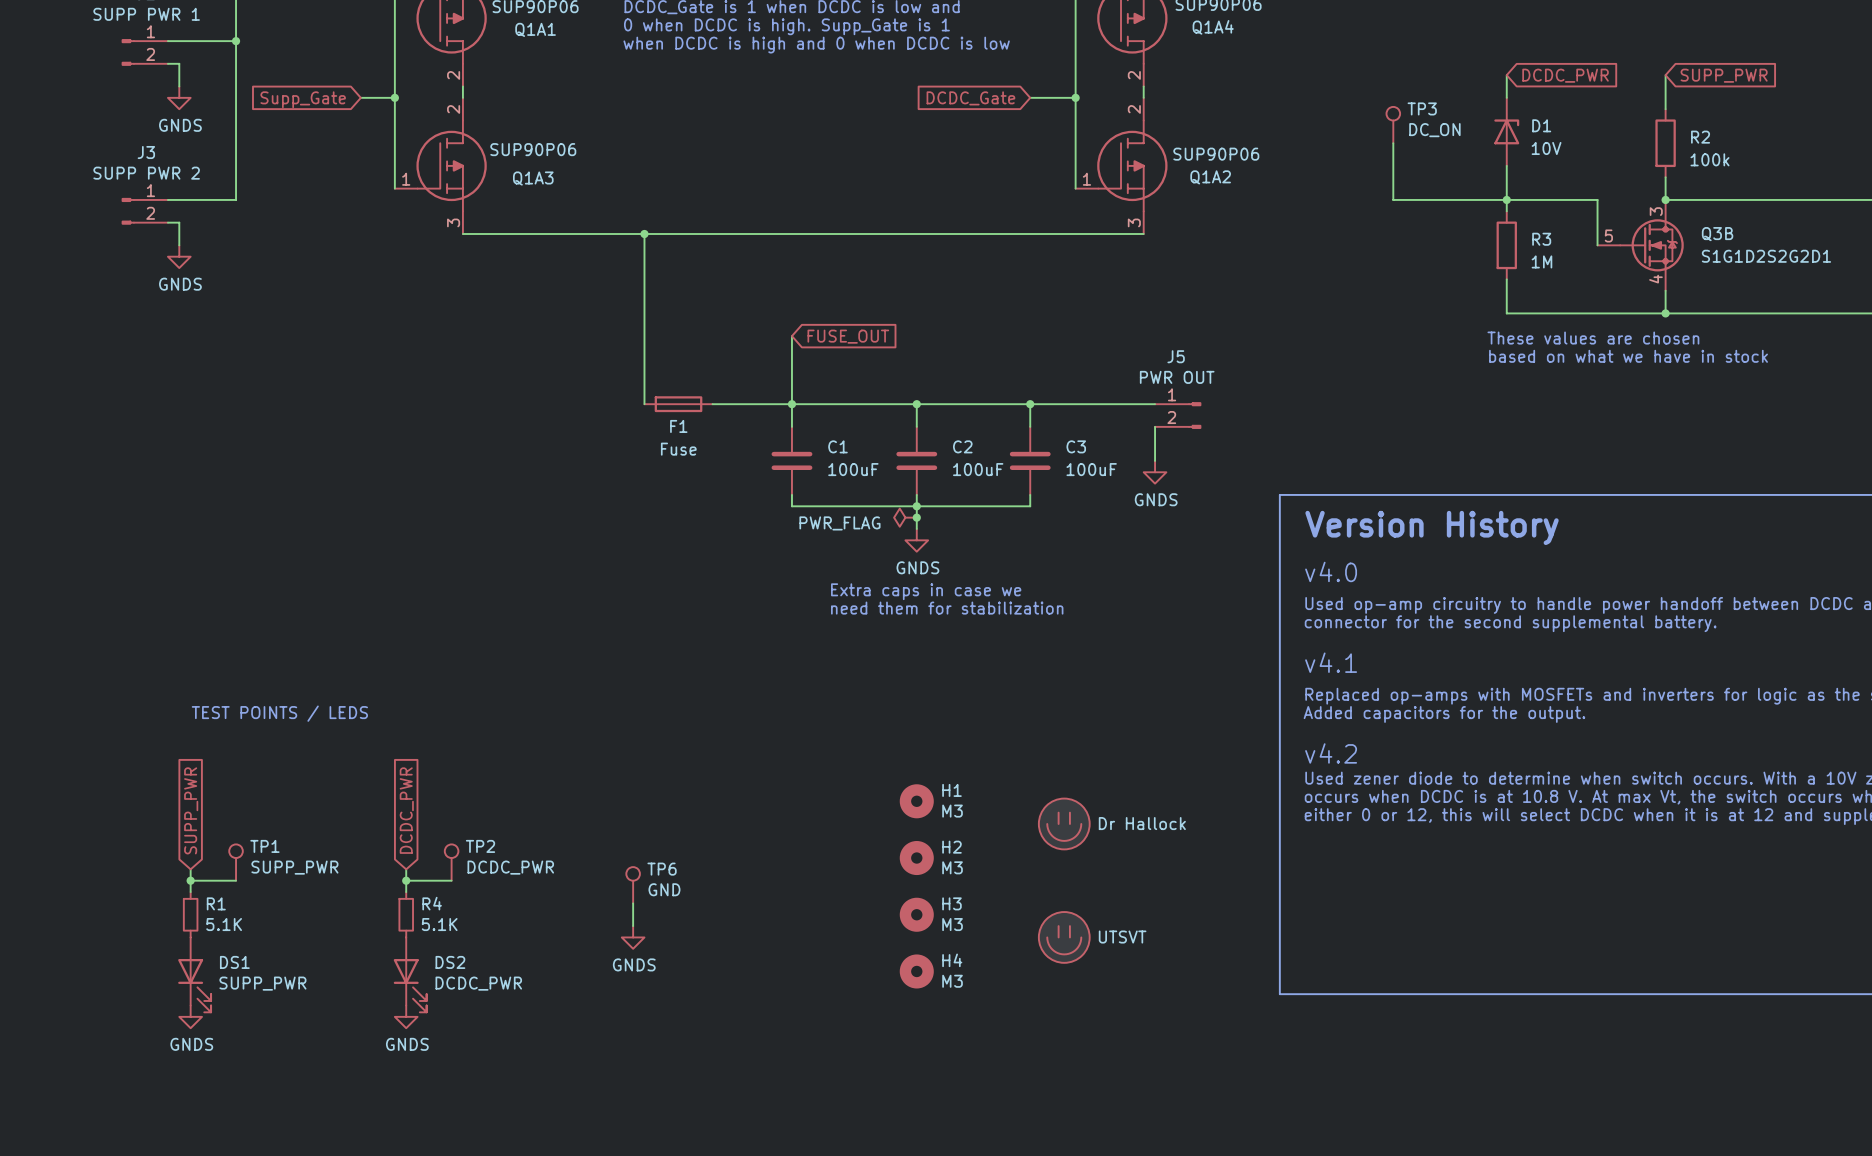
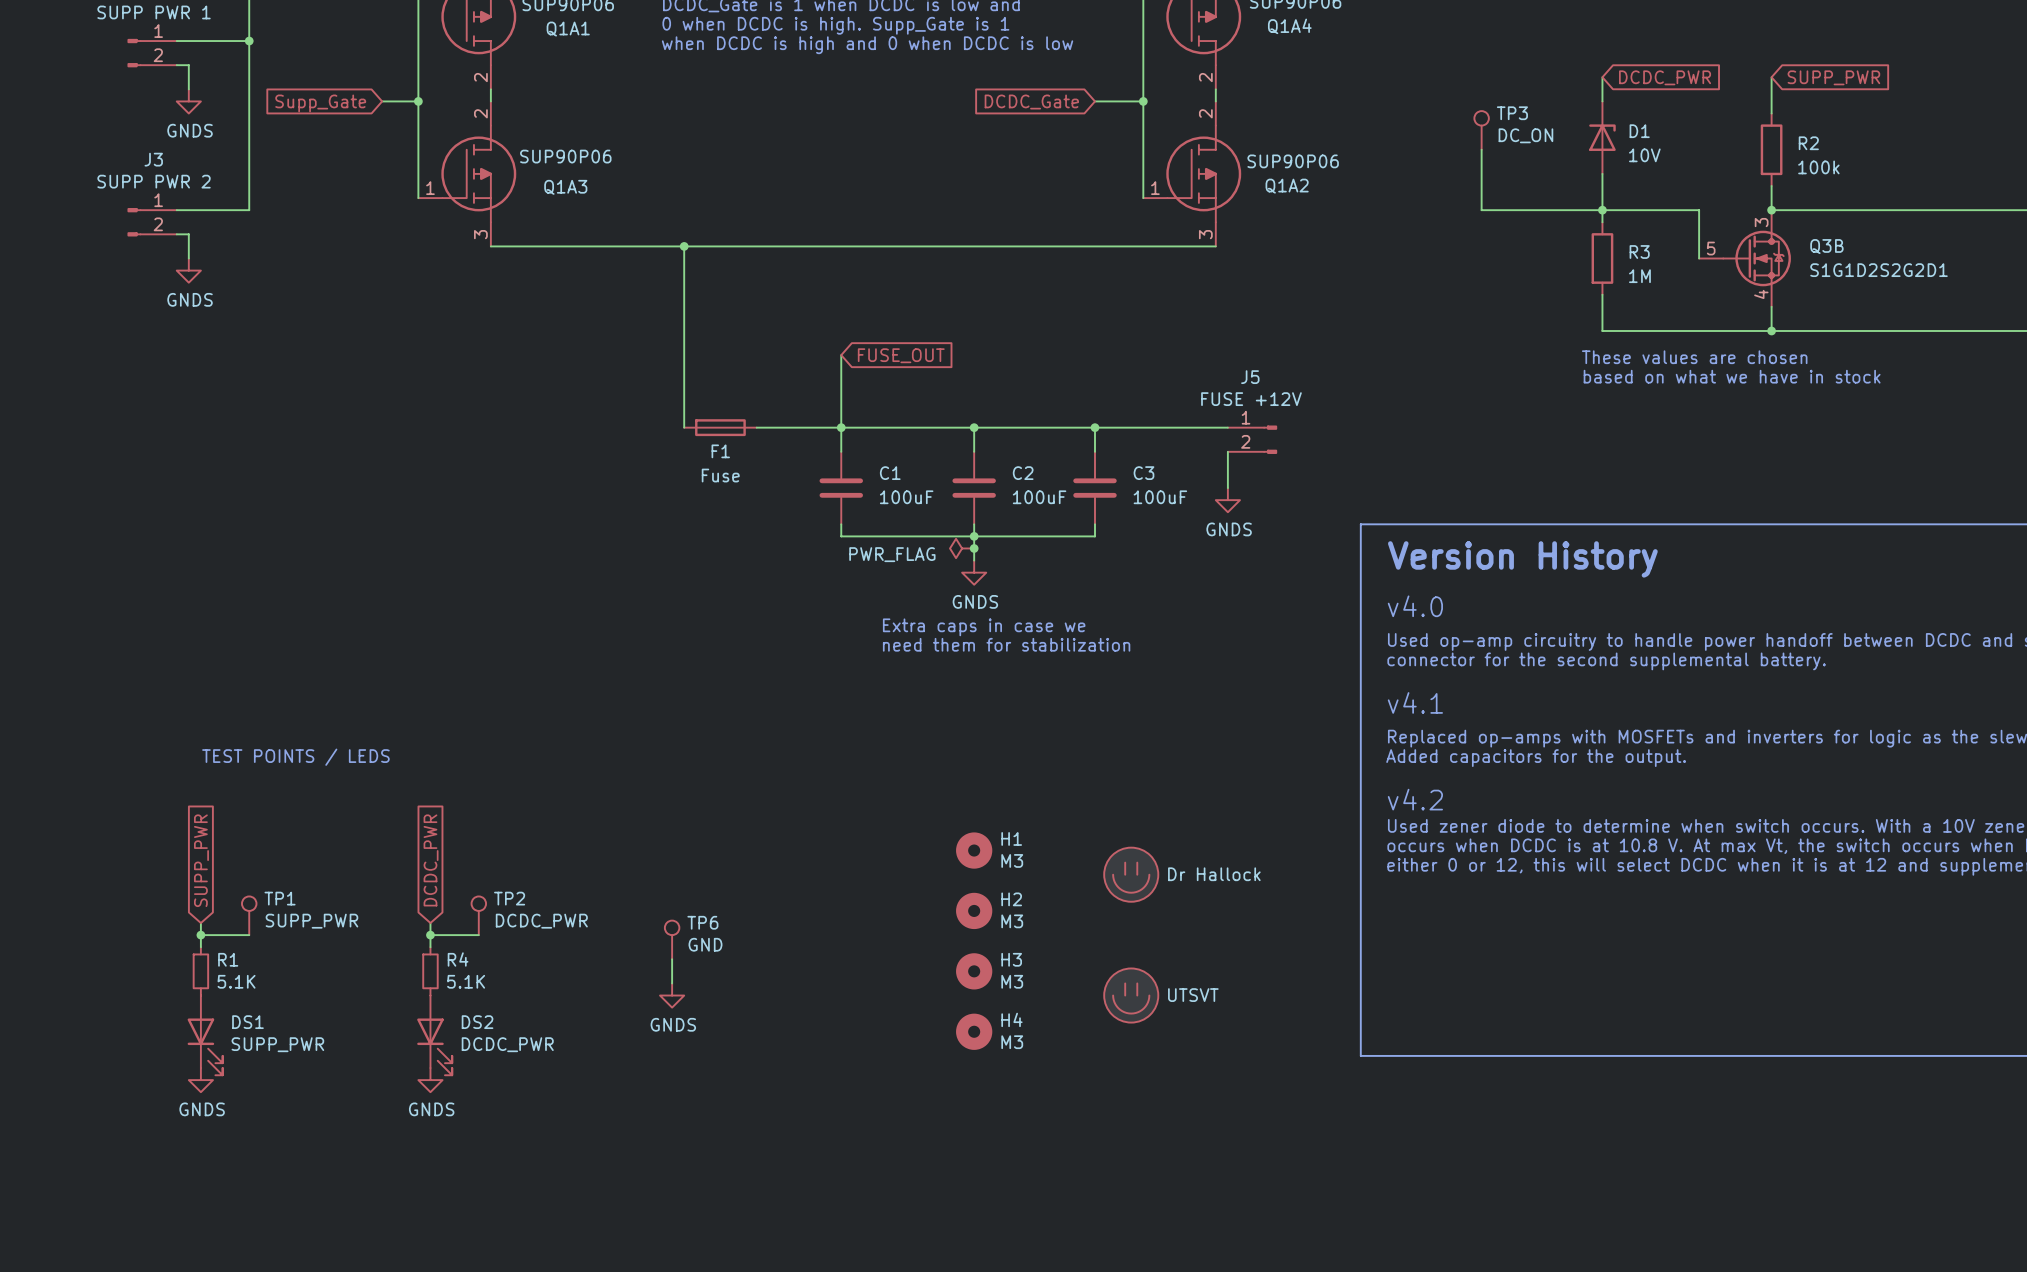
J5 value: PWR OUT (1177, 377) -> FUSE +12V (1251, 399)

